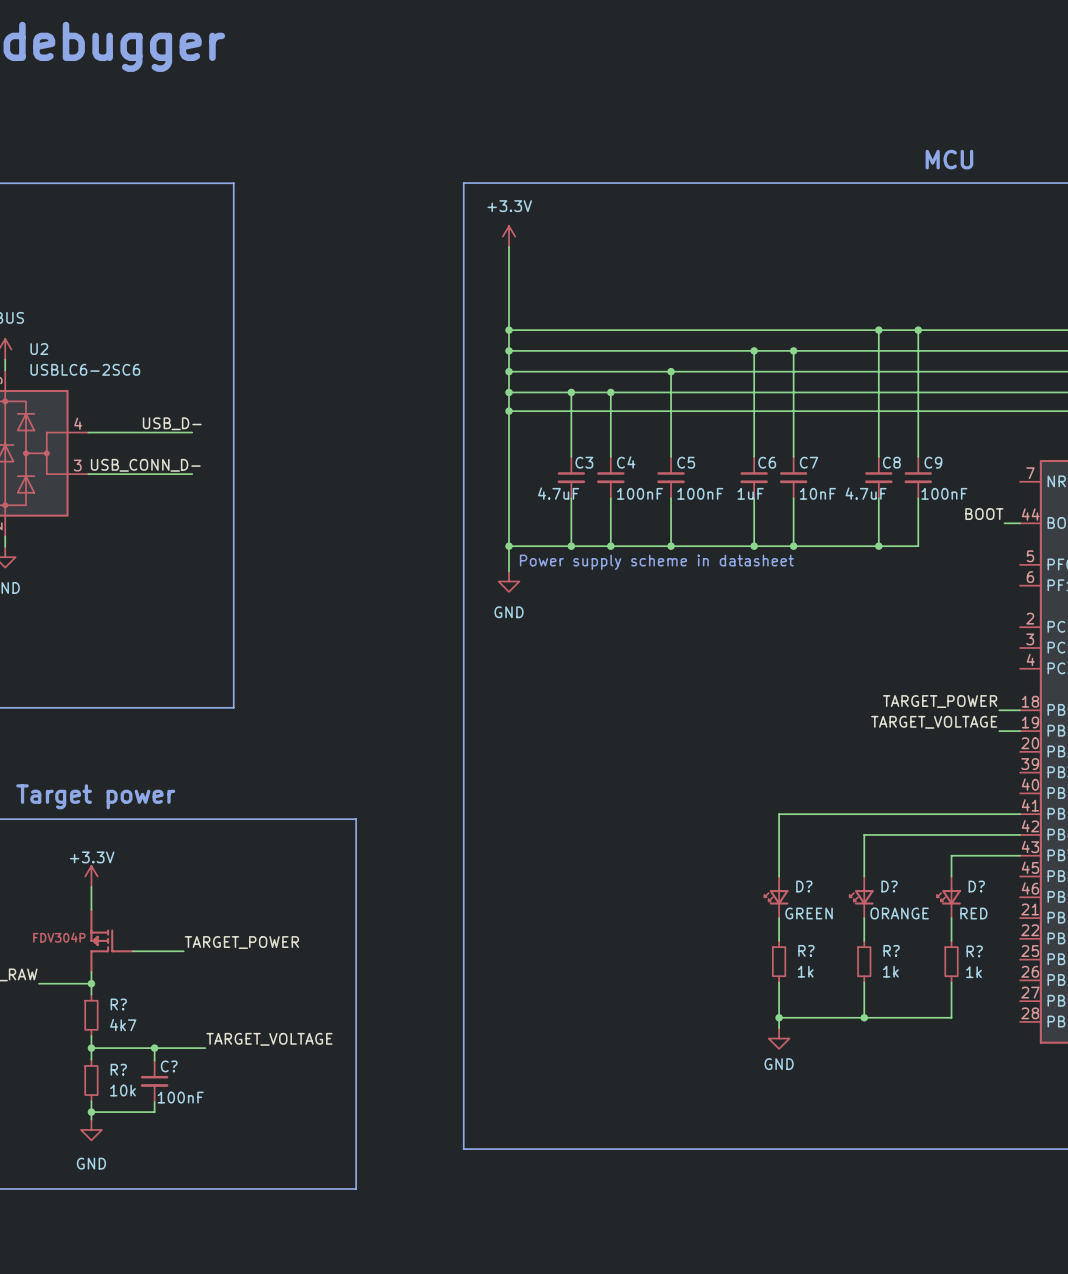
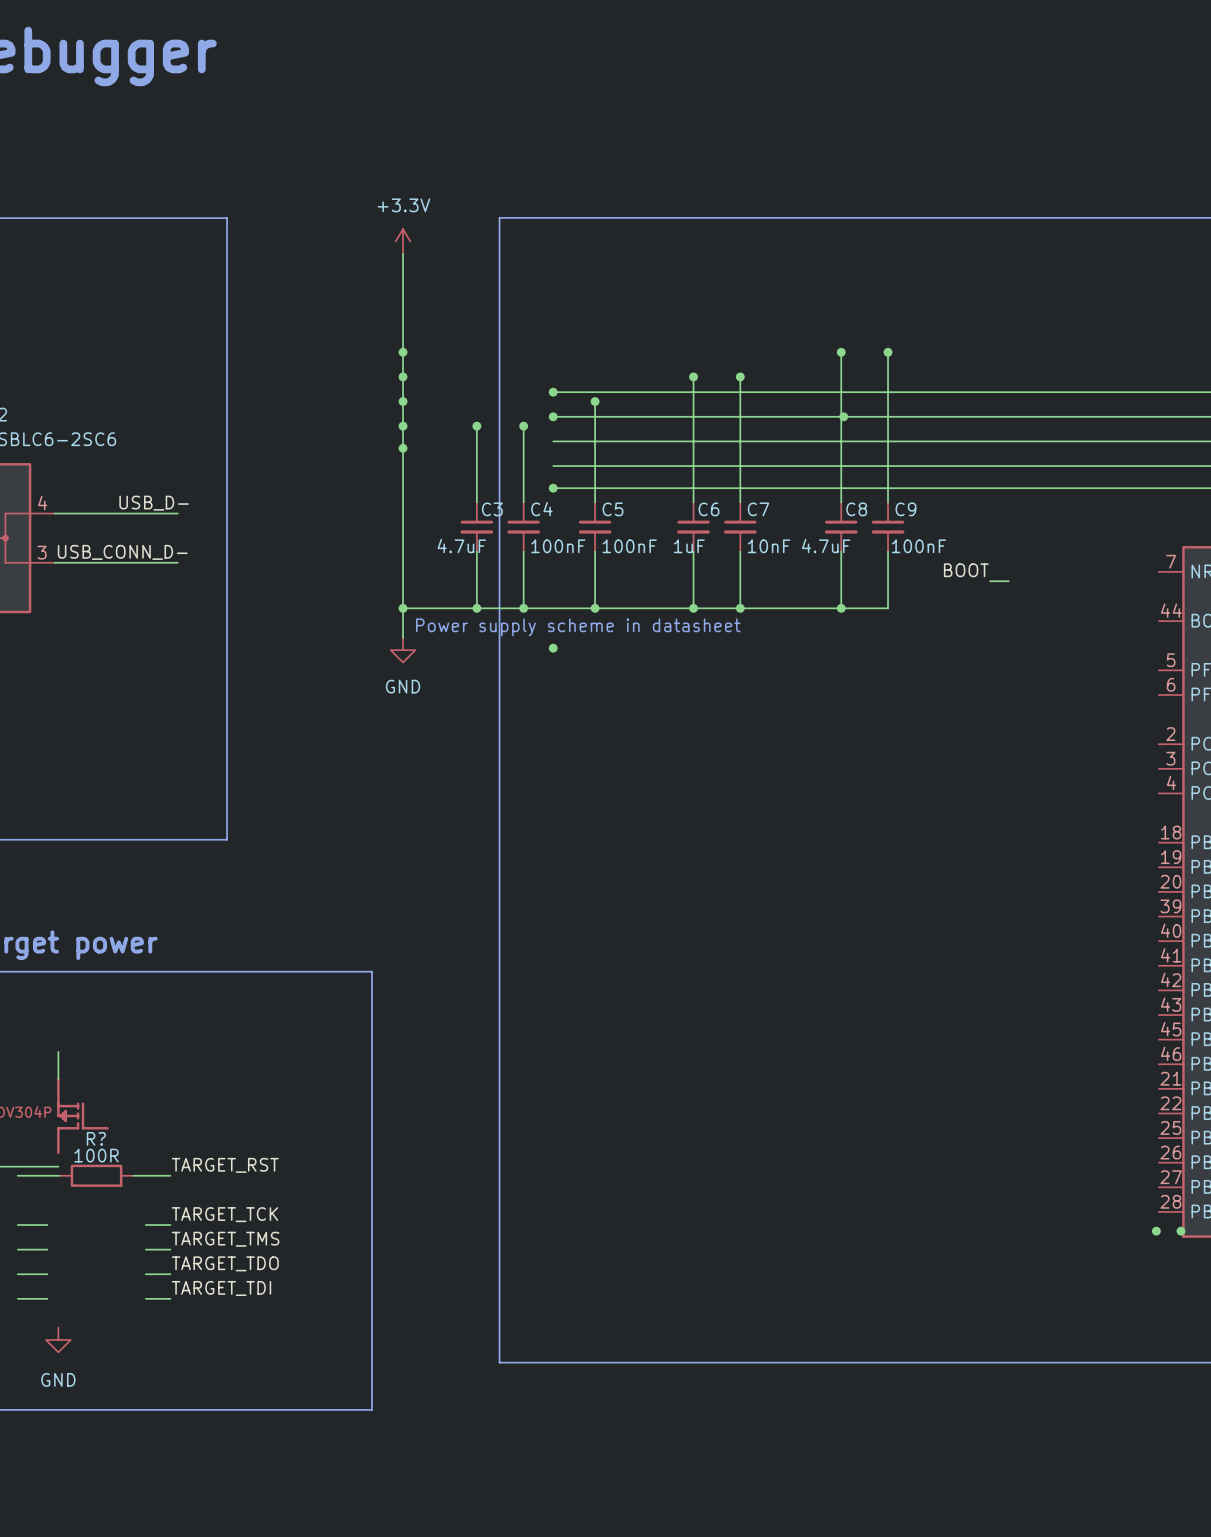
text: MCU (949, 159) -> none
power symbol position: +3.3V (509, 236) -> +3.3V (403, 241)
wire: (509, 247) (509, 571) -> (403, 253) (403, 637)
junction: none -> (403, 352)
junction: none -> (841, 352)
junction: none -> (888, 352)
junction: none -> (403, 376)
junction: none -> (693, 376)
junction: none -> (740, 376)
wire: (878, 330) (878, 456) -> (841, 352) (841, 502)
junction: (878, 330) -> none
wire: (918, 330) (918, 456) -> (888, 352) (888, 502)
junction: (918, 330) -> none
junction: none -> (403, 401)
junction: none -> (595, 401)
wire: (754, 350) (754, 456) -> (693, 376) (693, 502)
wire: (793, 350) (793, 456) -> (740, 376) (740, 502)
junction: (793, 350) -> none
junction: none -> (403, 426)
junction: none -> (476, 426)
junction: none -> (523, 426)
junction: (509, 371) -> none
wire: (671, 371) (671, 456) -> (595, 401) (595, 502)
junction: (671, 371) -> none
junction: none -> (403, 448)
junction: (509, 392) -> none
wire: (571, 392) (571, 456) -> (476, 426) (476, 502)
junction: (571, 392) -> none
wire: (610, 392) (610, 456) -> (523, 426) (523, 502)
junction: (610, 392) -> none
C3 position: (571, 477) -> (476, 527)
C4 position: (610, 477) -> (523, 527)
C5 position: (671, 477) -> (595, 527)
C6 position: (754, 477) -> (693, 527)
C7 position: (793, 477) -> (740, 527)
C8 position: (878, 477) -> (841, 527)
C9 position: (918, 477) -> (888, 527)
wire: (571, 498) (571, 546) -> (476, 551) (476, 608)
wire: (610, 498) (610, 546) -> (523, 551) (523, 608)
wire: (671, 498) (671, 546) -> (595, 551) (595, 608)
wire: (754, 498) (754, 546) -> (693, 551) (693, 608)
wire: (793, 498) (793, 546) -> (740, 551) (740, 608)
wire: (878, 498) (878, 546) -> (841, 551) (841, 608)
wire: (918, 498) (918, 546) (509, 546) -> (888, 551) (888, 608) (403, 608)
junction: none -> (403, 608)
junction: none -> (476, 608)
junction: none -> (523, 608)
junction: none -> (595, 608)
junction: none -> (693, 608)
junction: none -> (740, 608)
junction: none -> (841, 608)
label position: BOOT (984, 514) -> BOOT (966, 570)
wire: (1004, 523) (1020, 523) -> (990, 581) (1008, 581)
junction: (571, 546) -> none
junction: (610, 546) -> none
junction: (671, 546) -> none
junction: (754, 546) -> none
junction: (793, 546) -> none
junction: (878, 546) -> none
text position: Power supply scheme in datasheet (656, 562) -> Power supply scheme in datasheet (578, 627)
power symbol position: GND (509, 581) -> GND (403, 650)
label: TARGET_POWER (940, 701) -> none
wire: (999, 710) (1020, 710) -> none
label: TARGET_VOLTAGE (934, 722) -> none
wire: (999, 731) (1020, 731) -> none
wire: (1020, 814) (779, 814) (779, 876) -> none
wire: (1020, 834) (864, 834) (864, 876) -> none
wire: (1020, 855) (951, 855) (951, 876) -> none
power symbol: +3.3V (91, 876) -> none
D?: GREEN (776, 897) -> none
D?: ORANGE (861, 897) -> none
D?: RED (948, 897) -> none
wire: (779, 918) (779, 940) -> none
wire: (864, 918) (864, 940) -> none
wire: (951, 918) (951, 940) -> none
label: TARGET_POWER (241, 942) -> none
wire: (132, 951) (183, 951) -> none
R?: 1k (779, 961) -> none
R?: 1k (864, 961) -> none
R?: 1k (951, 961) -> none
wire: (91, 972) (91, 994) -> none
label: none -> TARGET_RST (225, 1165)
wire: (779, 982) (779, 1028) -> none
wire: (864, 982) (864, 1017) -> none
wire: (951, 982) (951, 1017) (779, 1017) -> none
junction: (91, 983) -> none
wire: none -> (17, 1175) (59, 1175)
R?: none -> 100R (96, 1175)
wire: none -> (133, 1175) (170, 1175)
R?: 4k7 (91, 1015) -> none
junction: (779, 1017) -> none
junction: (864, 1017) -> none
label: none -> TARGET_TCK (225, 1214)
wire: none -> (17, 1225) (47, 1225)
wire: none -> (145, 1225) (170, 1225)
wire: (91, 1036) (91, 1059) -> none
power symbol: GND (779, 1038) -> none
junction: none -> (1156, 1231)
junction: none -> (1180, 1231)
label: TARGET_VOLTAGE (269, 1039) -> none
label: none -> TARGET_TMS (225, 1239)
wire: (91, 1048) (205, 1048) -> none
junction: (91, 1048) -> none
wire: (154, 1048) (154, 1060) -> none
junction: (154, 1048) -> none
wire: none -> (17, 1249) (47, 1249)
wire: none -> (145, 1249) (170, 1249)
label: none -> TARGET_TDO (225, 1263)
wire: none -> (17, 1274) (47, 1274)
wire: none -> (145, 1274) (170, 1274)
R?: 10k (91, 1080) -> none
C?: 100nF (154, 1081) -> none
label: none -> TARGET_TDI (221, 1288)
wire: none -> (17, 1298) (47, 1298)
wire: none -> (145, 1298) (170, 1298)
wire: (91, 1101) (91, 1119) -> none
wire: (154, 1102) (154, 1112) (91, 1112) -> none
junction: (91, 1112) -> none

